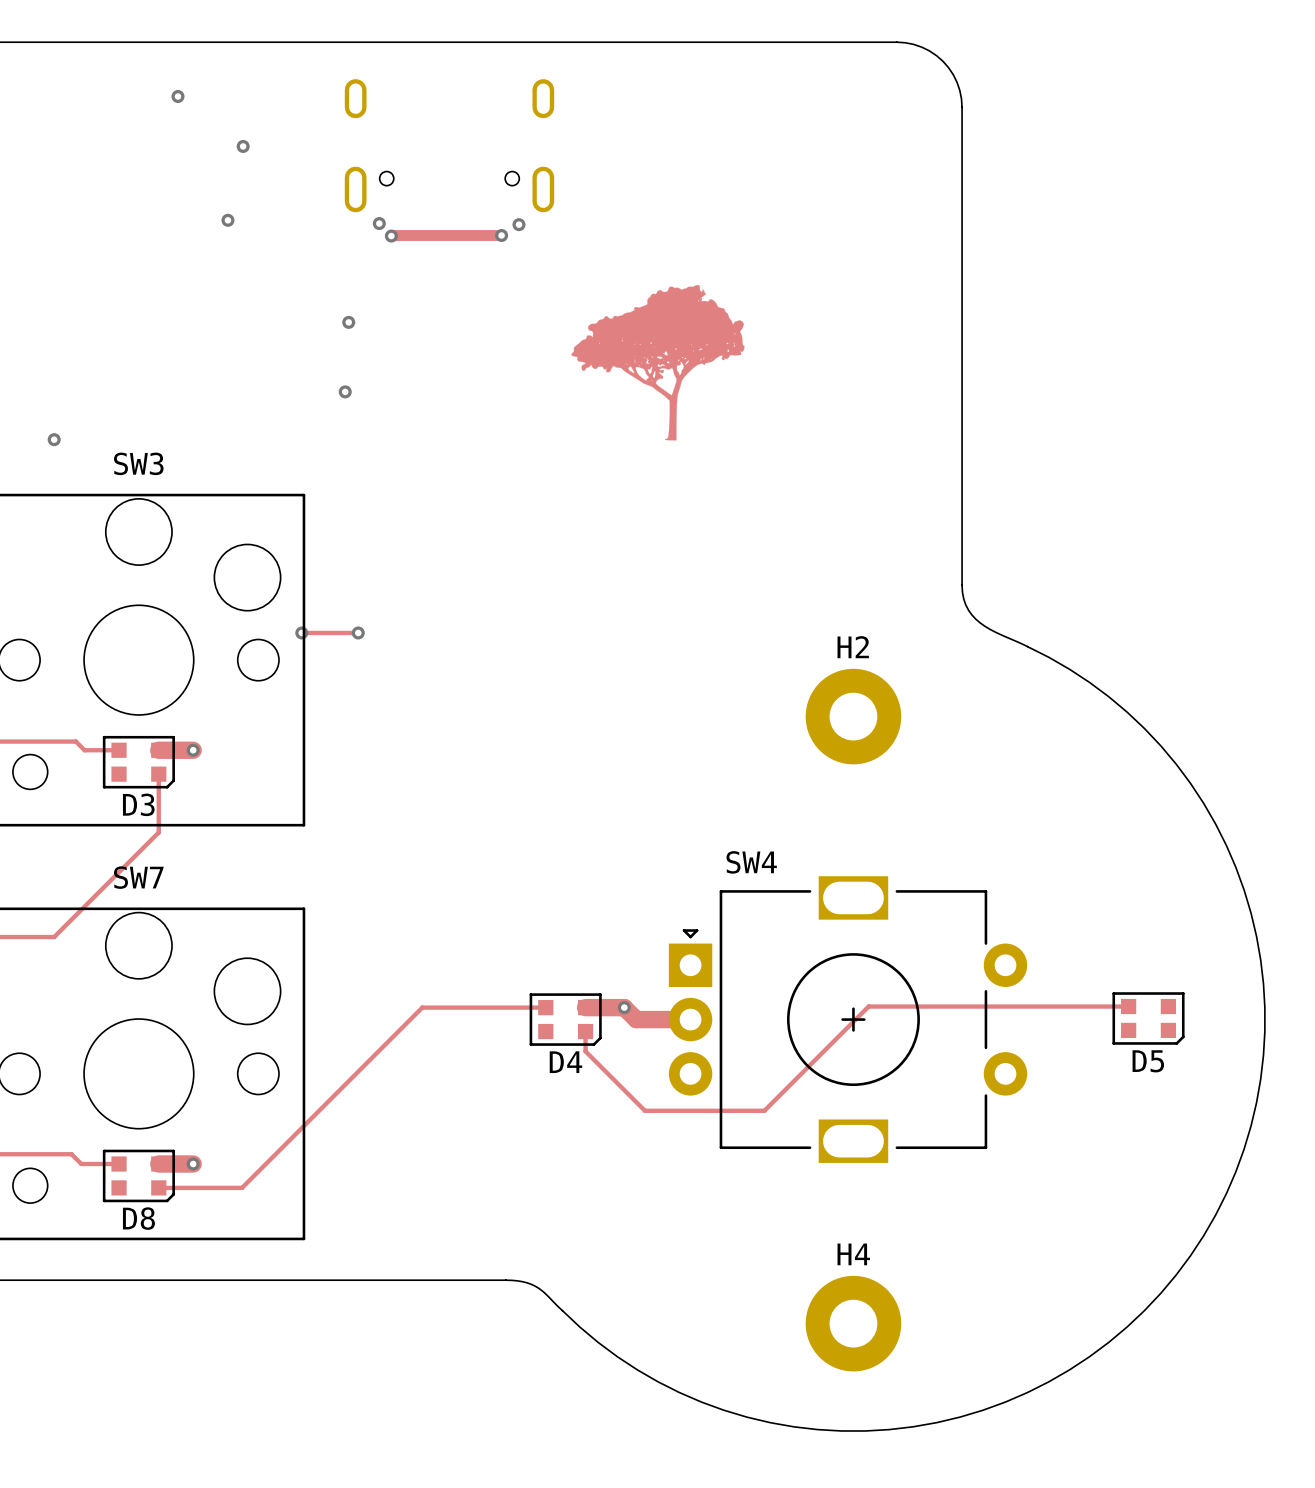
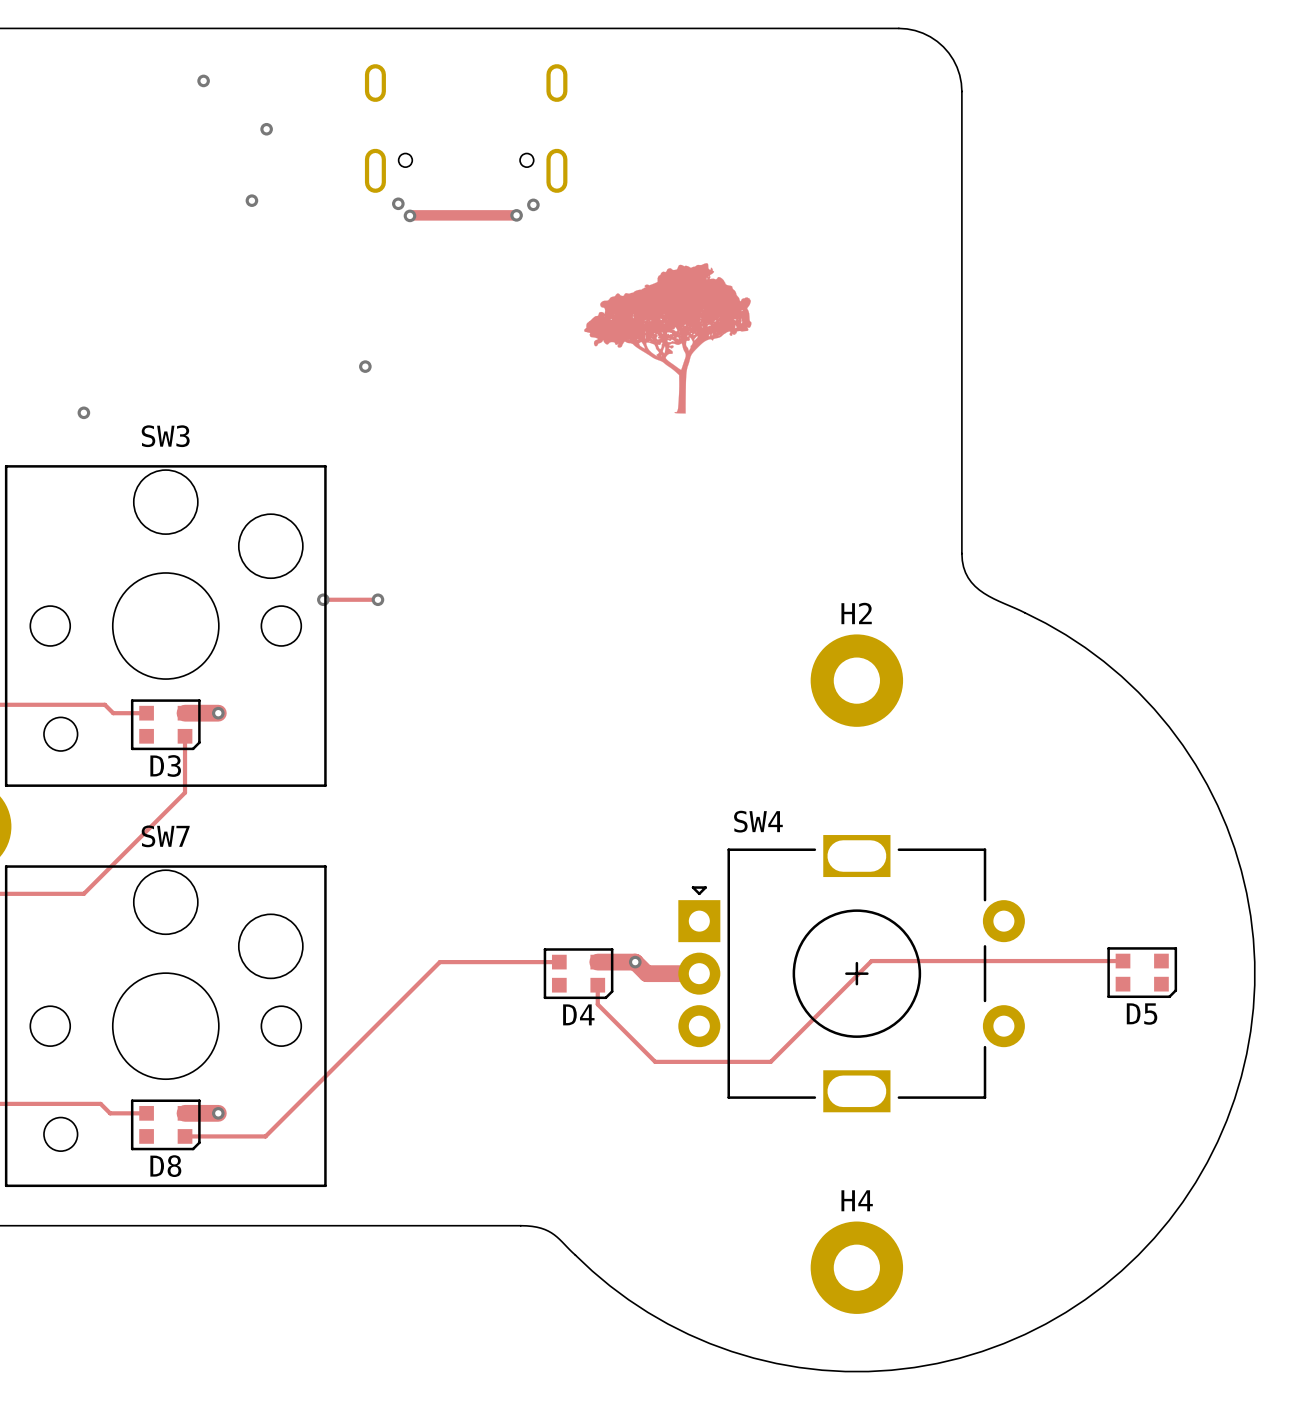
via: (348, 322) -> none

